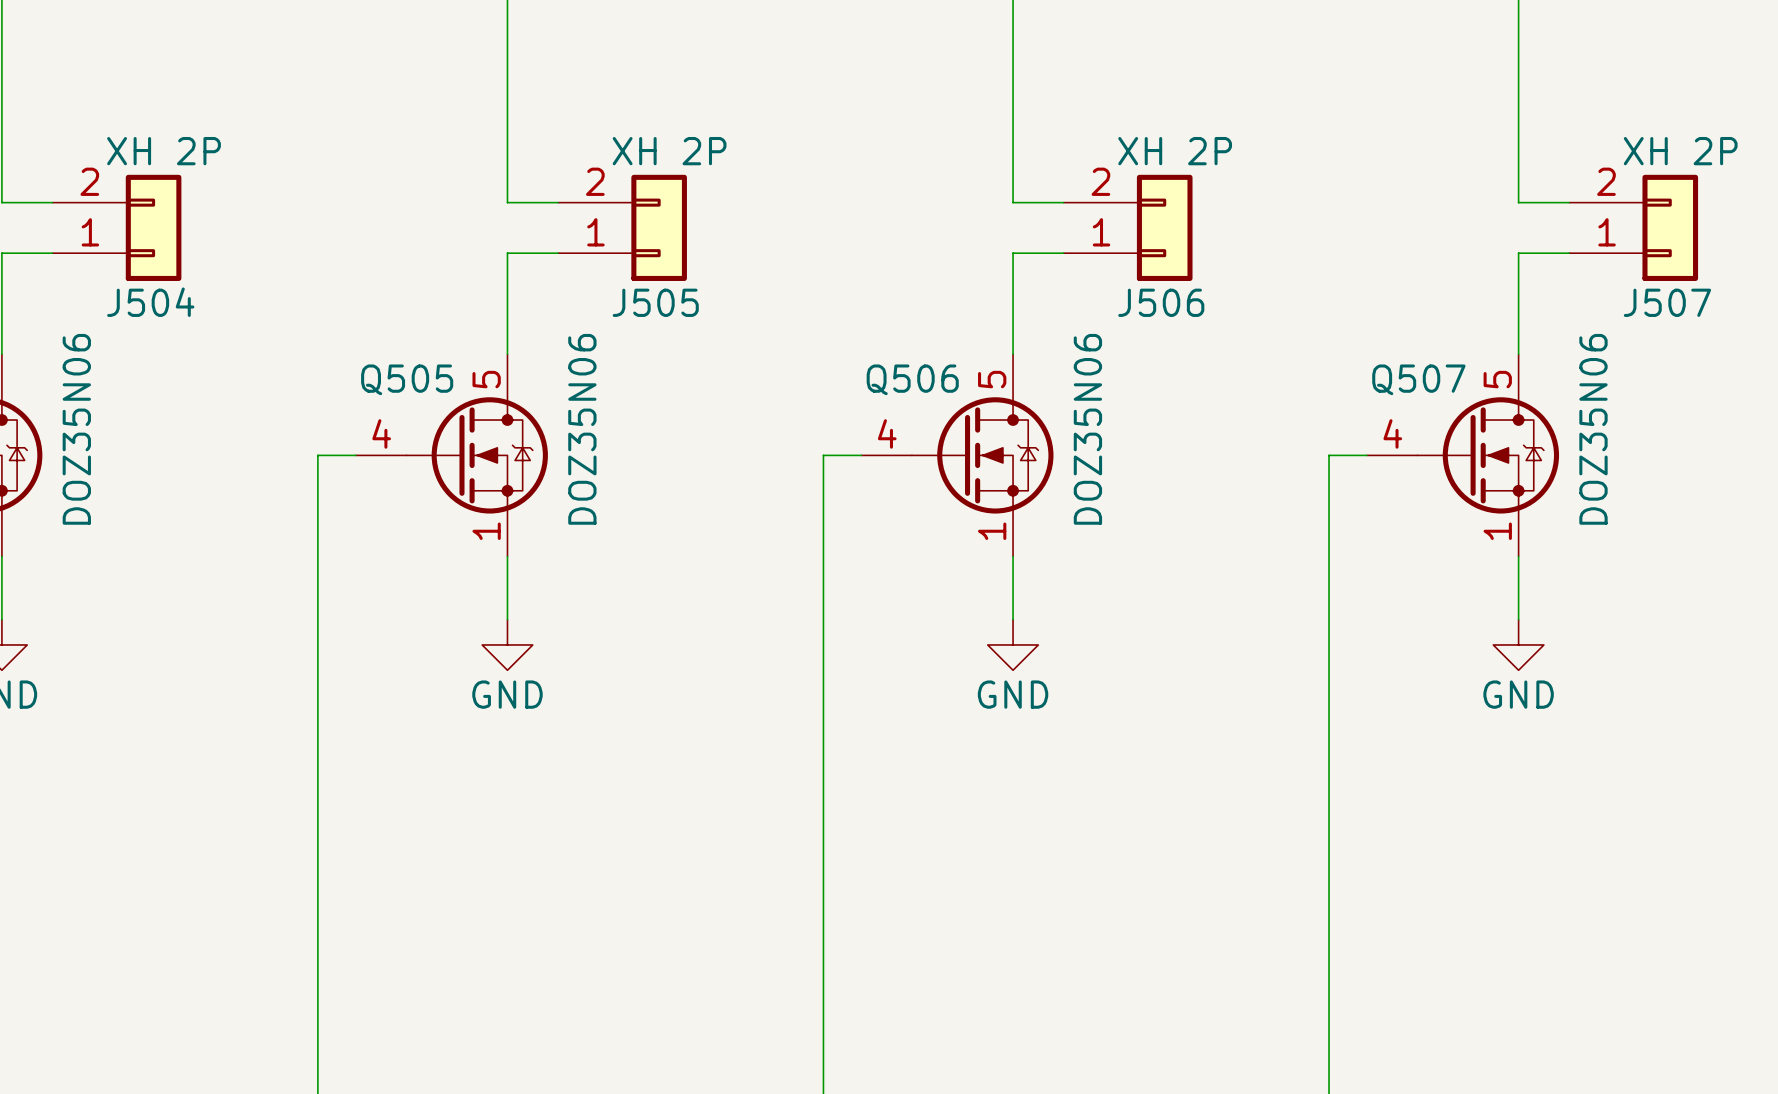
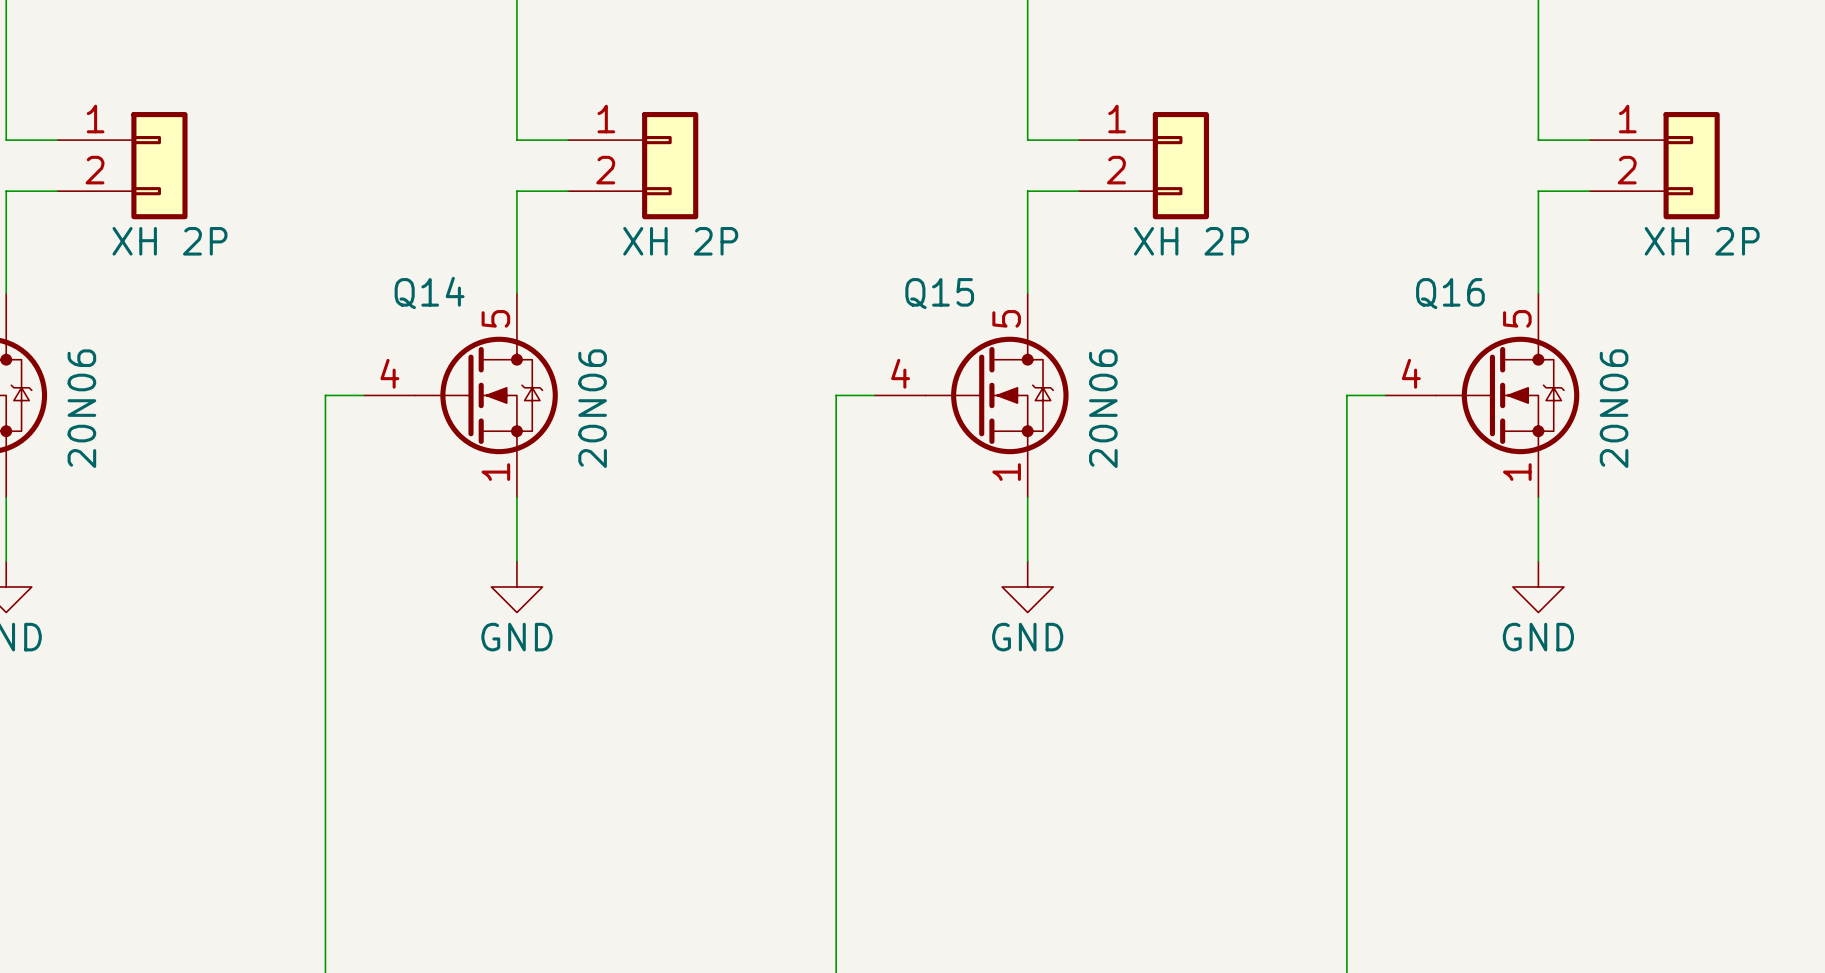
J504 flip: as is (153, 227) -> up-down (159, 165)
J505 flip: as is (659, 227) -> up-down (670, 165)
J506 flip: as is (1164, 227) -> up-down (1180, 165)
J507 flip: as is (1670, 227) -> up-down (1691, 165)
J504 name: J504 (150, 302) -> none
J505 name: J505 (655, 302) -> none
J506 name: J506 (1161, 302) -> none
J507 name: J507 (1667, 302) -> none
Q505 name: Q505 (407, 379) -> Q14 (429, 292)
Q506 name: Q506 (912, 379) -> Q15 (939, 293)
Q507 name: Q507 (1418, 379) -> Q16 (1450, 293)
part value: DOZ35N06 (76, 429) -> 20N06 (81, 408)
Q505 value: DOZ35N06 (582, 429) -> 20N06 (592, 408)
Q506 value: DOZ35N06 (1087, 429) -> 20N06 (1103, 408)
Q507 value: DOZ35N06 (1593, 429) -> 20N06 (1614, 408)

